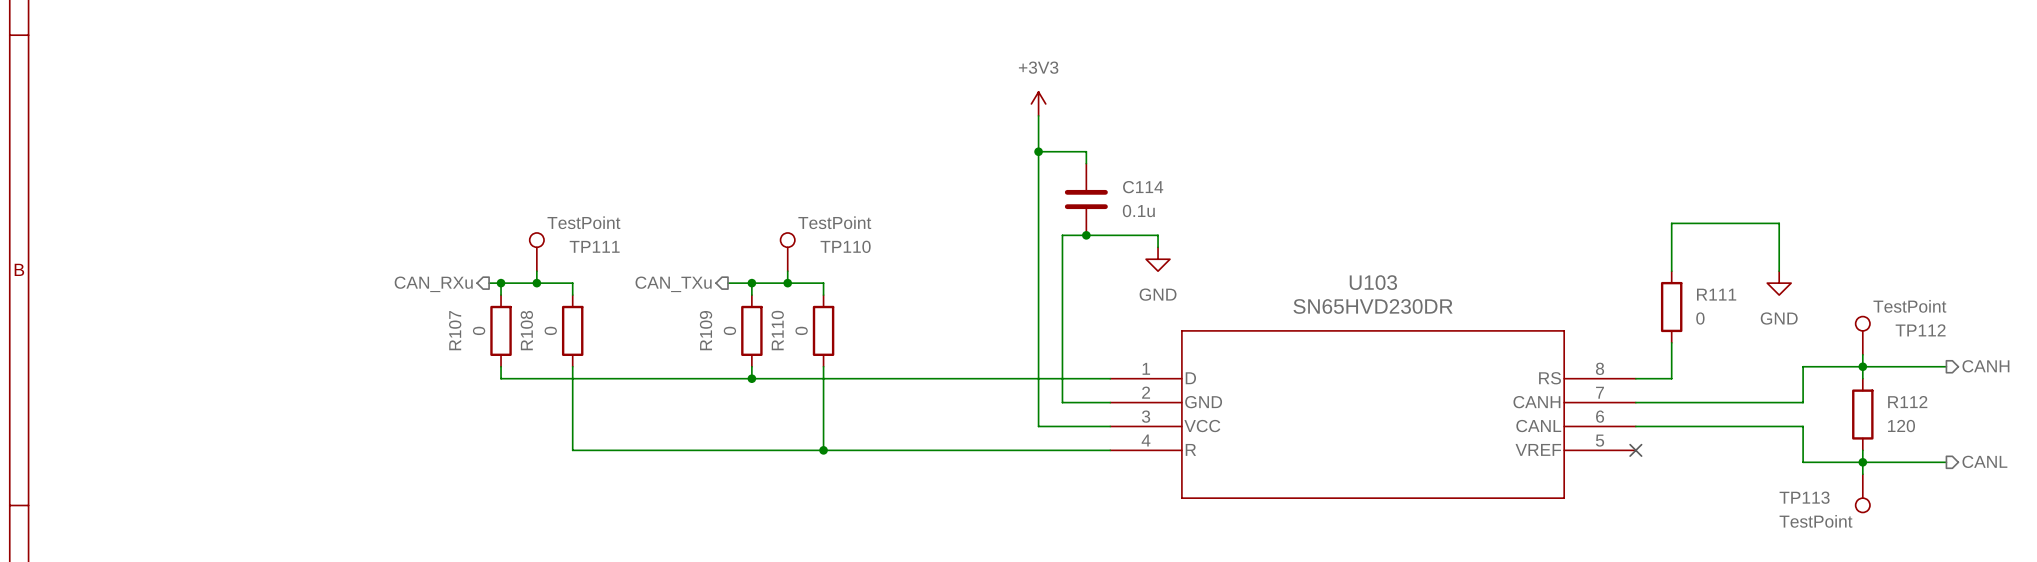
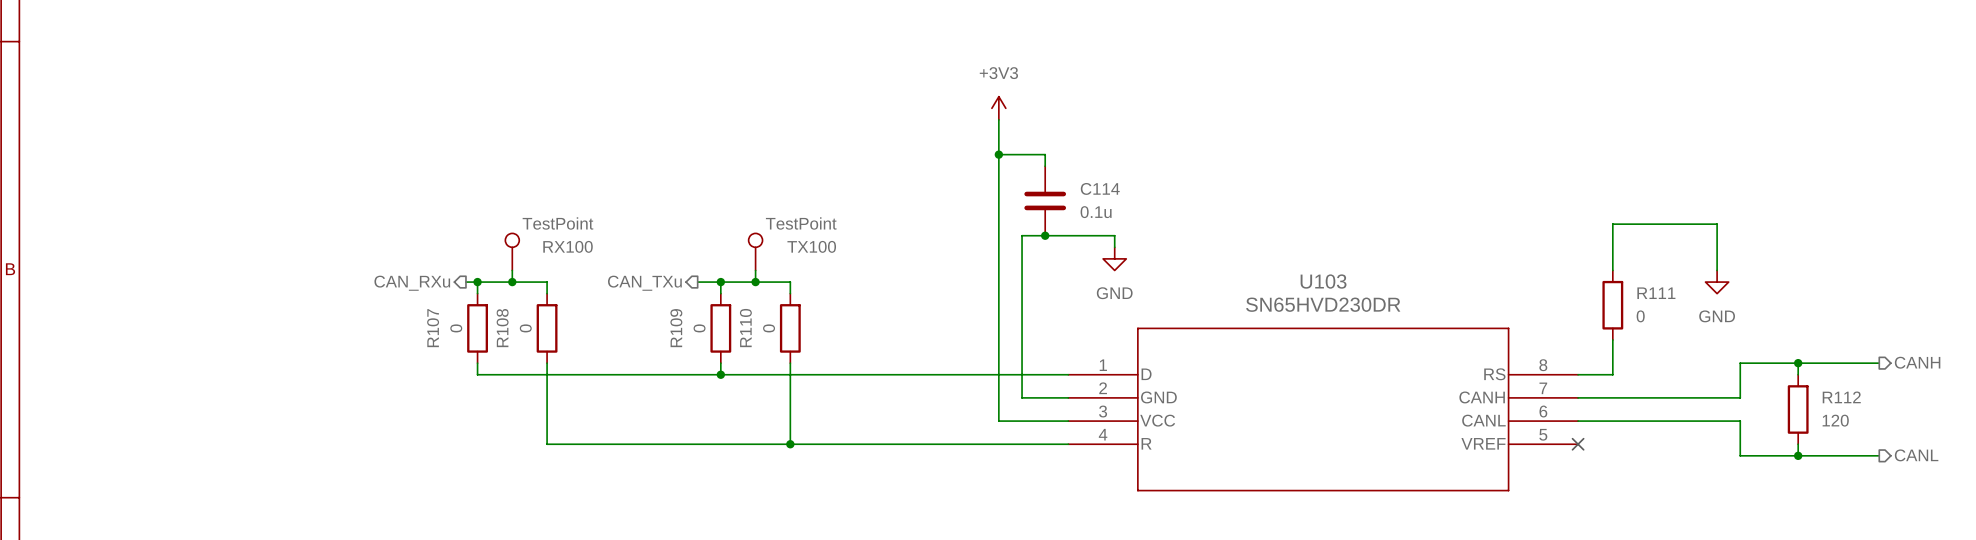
TP111 name: TP111 (594, 246) -> RX100 (568, 246)
TP110 name: TP110 (845, 246) -> TX100 (811, 246)
TP112: TestPoint (1862, 335) -> none
wire: (1862, 354) (1862, 366) -> none
wire: (1862, 462) (1862, 474) -> none
TP113: TestPoint (1862, 493) -> none

